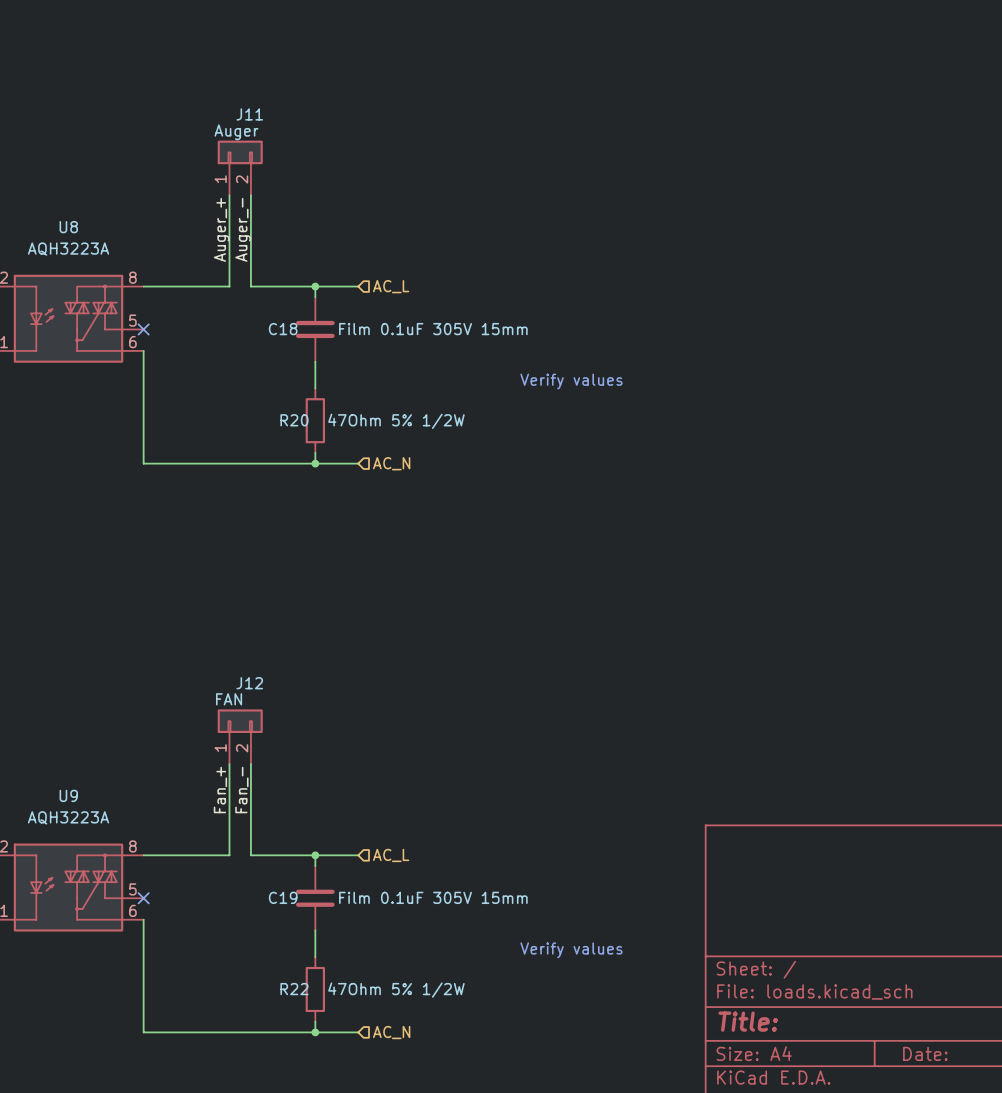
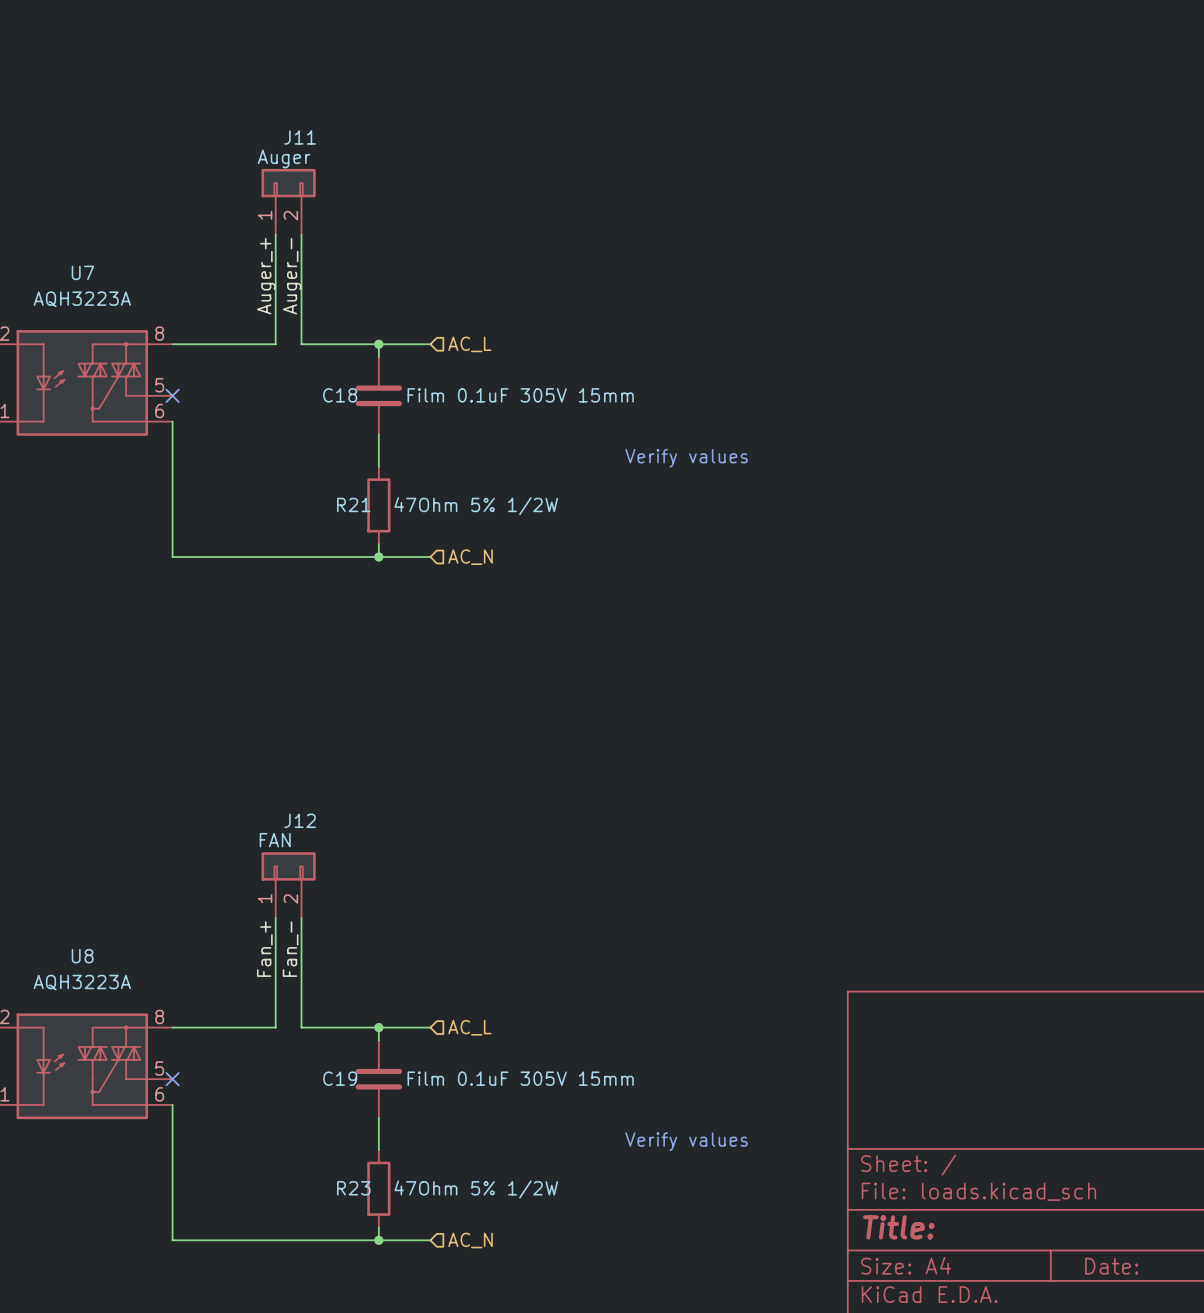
U8 name: U8 (68, 227) -> U7 (82, 272)
R20 name: R20 (294, 420) -> R21 (353, 504)
U9 name: U9 (68, 795) -> U8 (82, 956)
R22 name: R22 (294, 989) -> R23 (353, 1188)

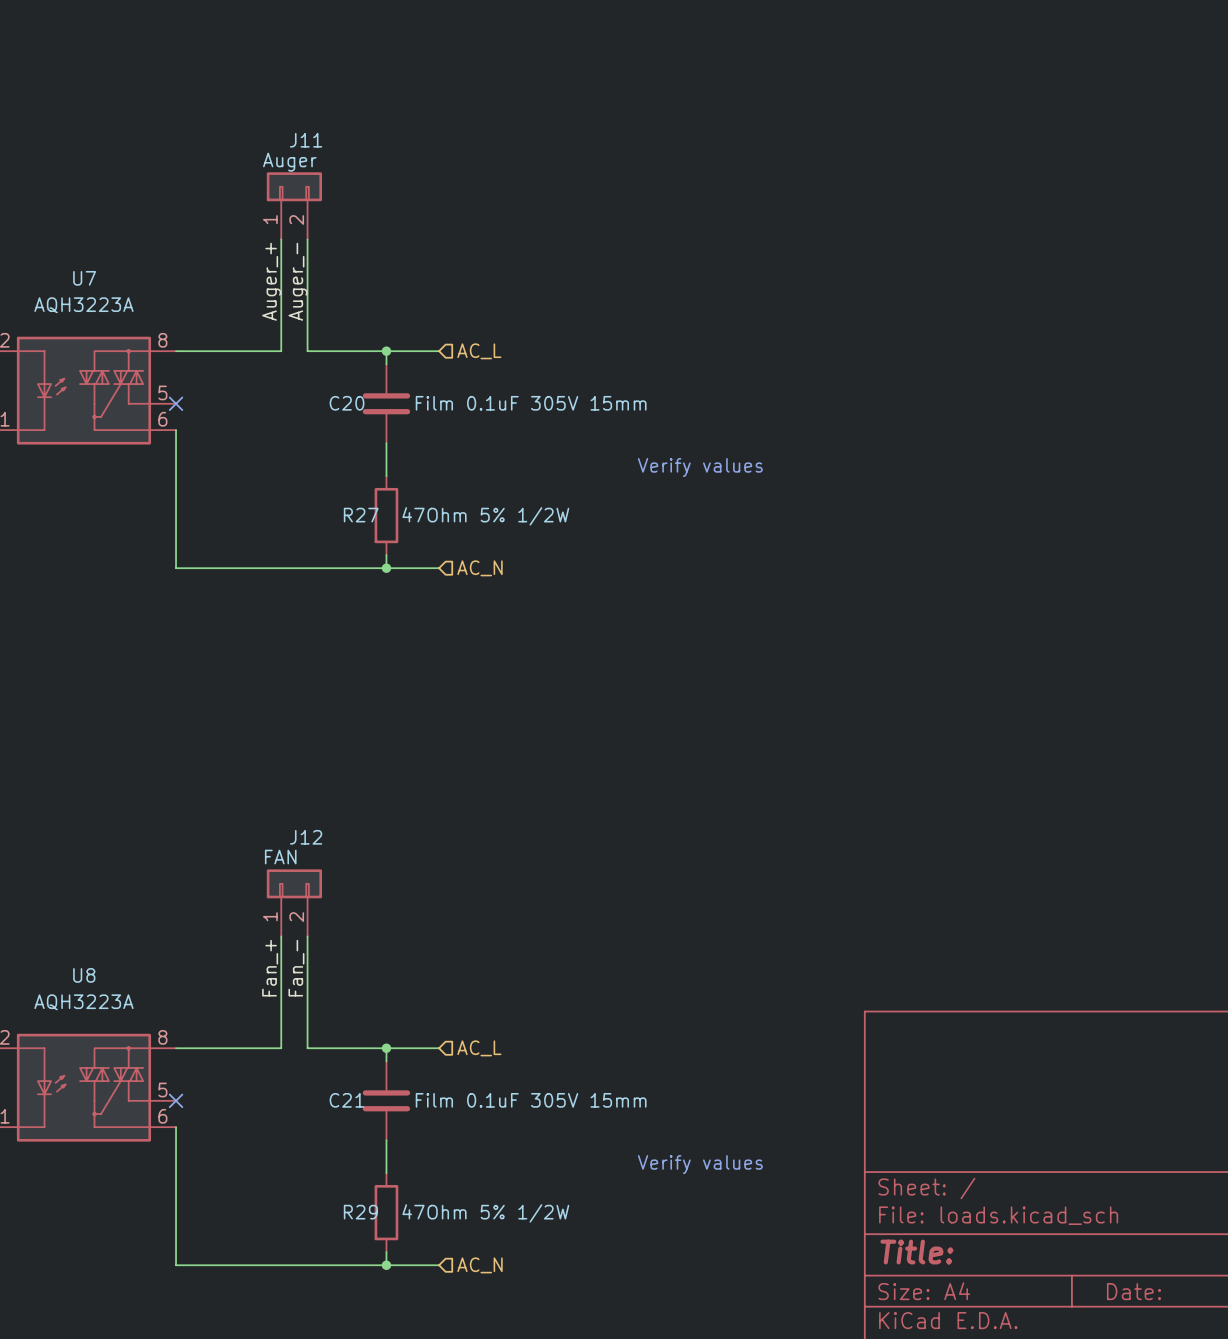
C18 name: C18 (340, 395) -> C20 (347, 403)
R21 name: R21 (353, 504) -> R27 (361, 515)
C19 name: C19 (340, 1078) -> C21 (347, 1100)
R23 name: R23 (353, 1188) -> R29 (360, 1212)

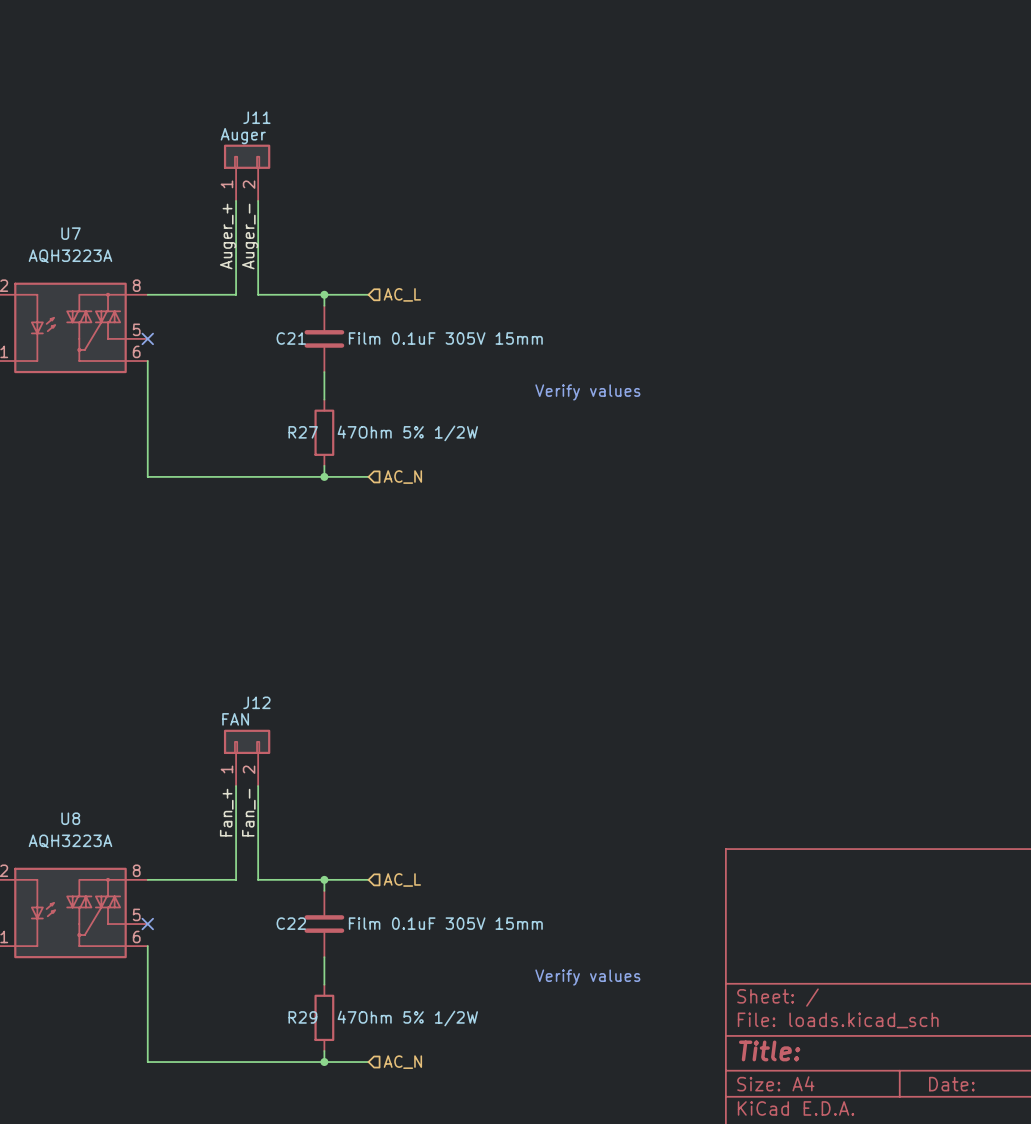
C20 name: C20 (347, 403) -> C21 (291, 338)
C21 name: C21 (347, 1100) -> C22 (291, 923)

